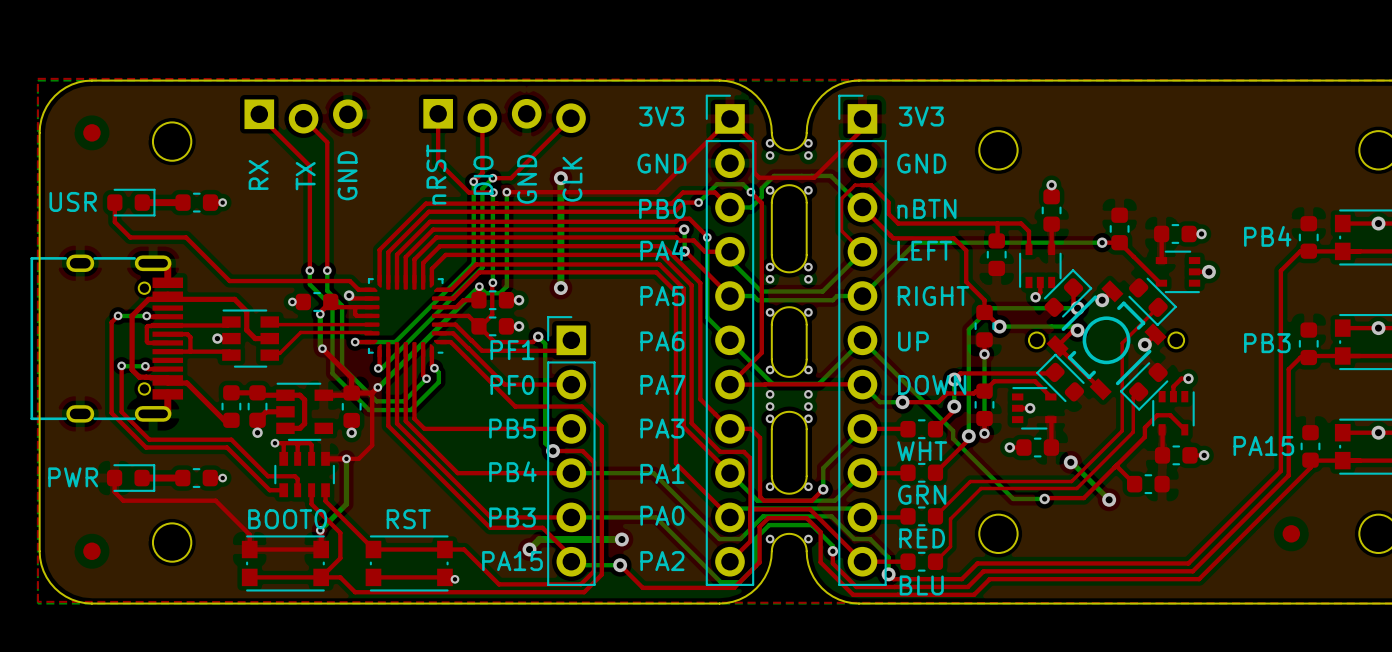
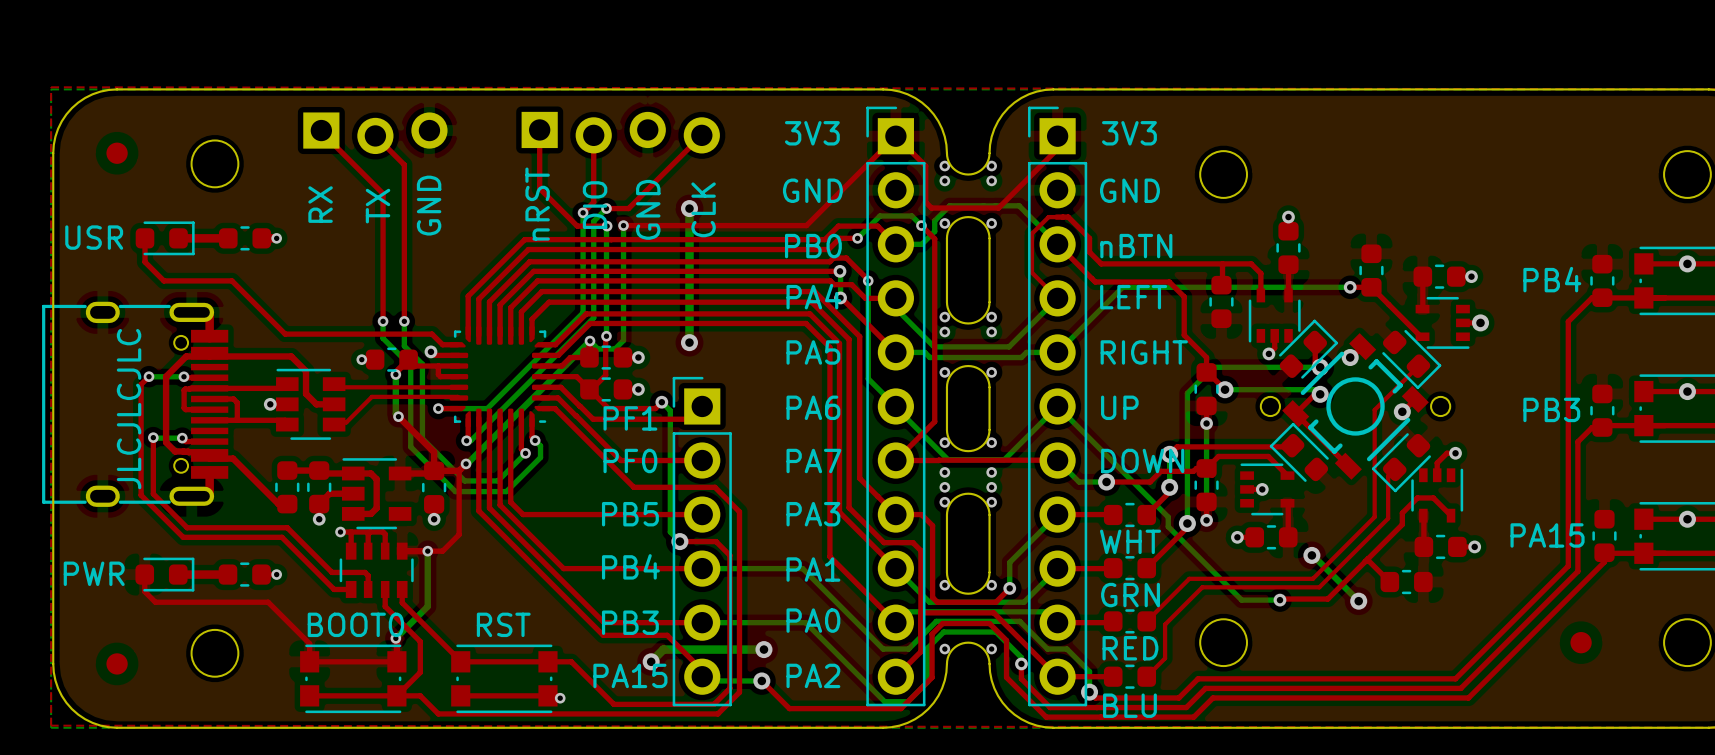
text: none -> JLCJLCJLC (129, 409)

